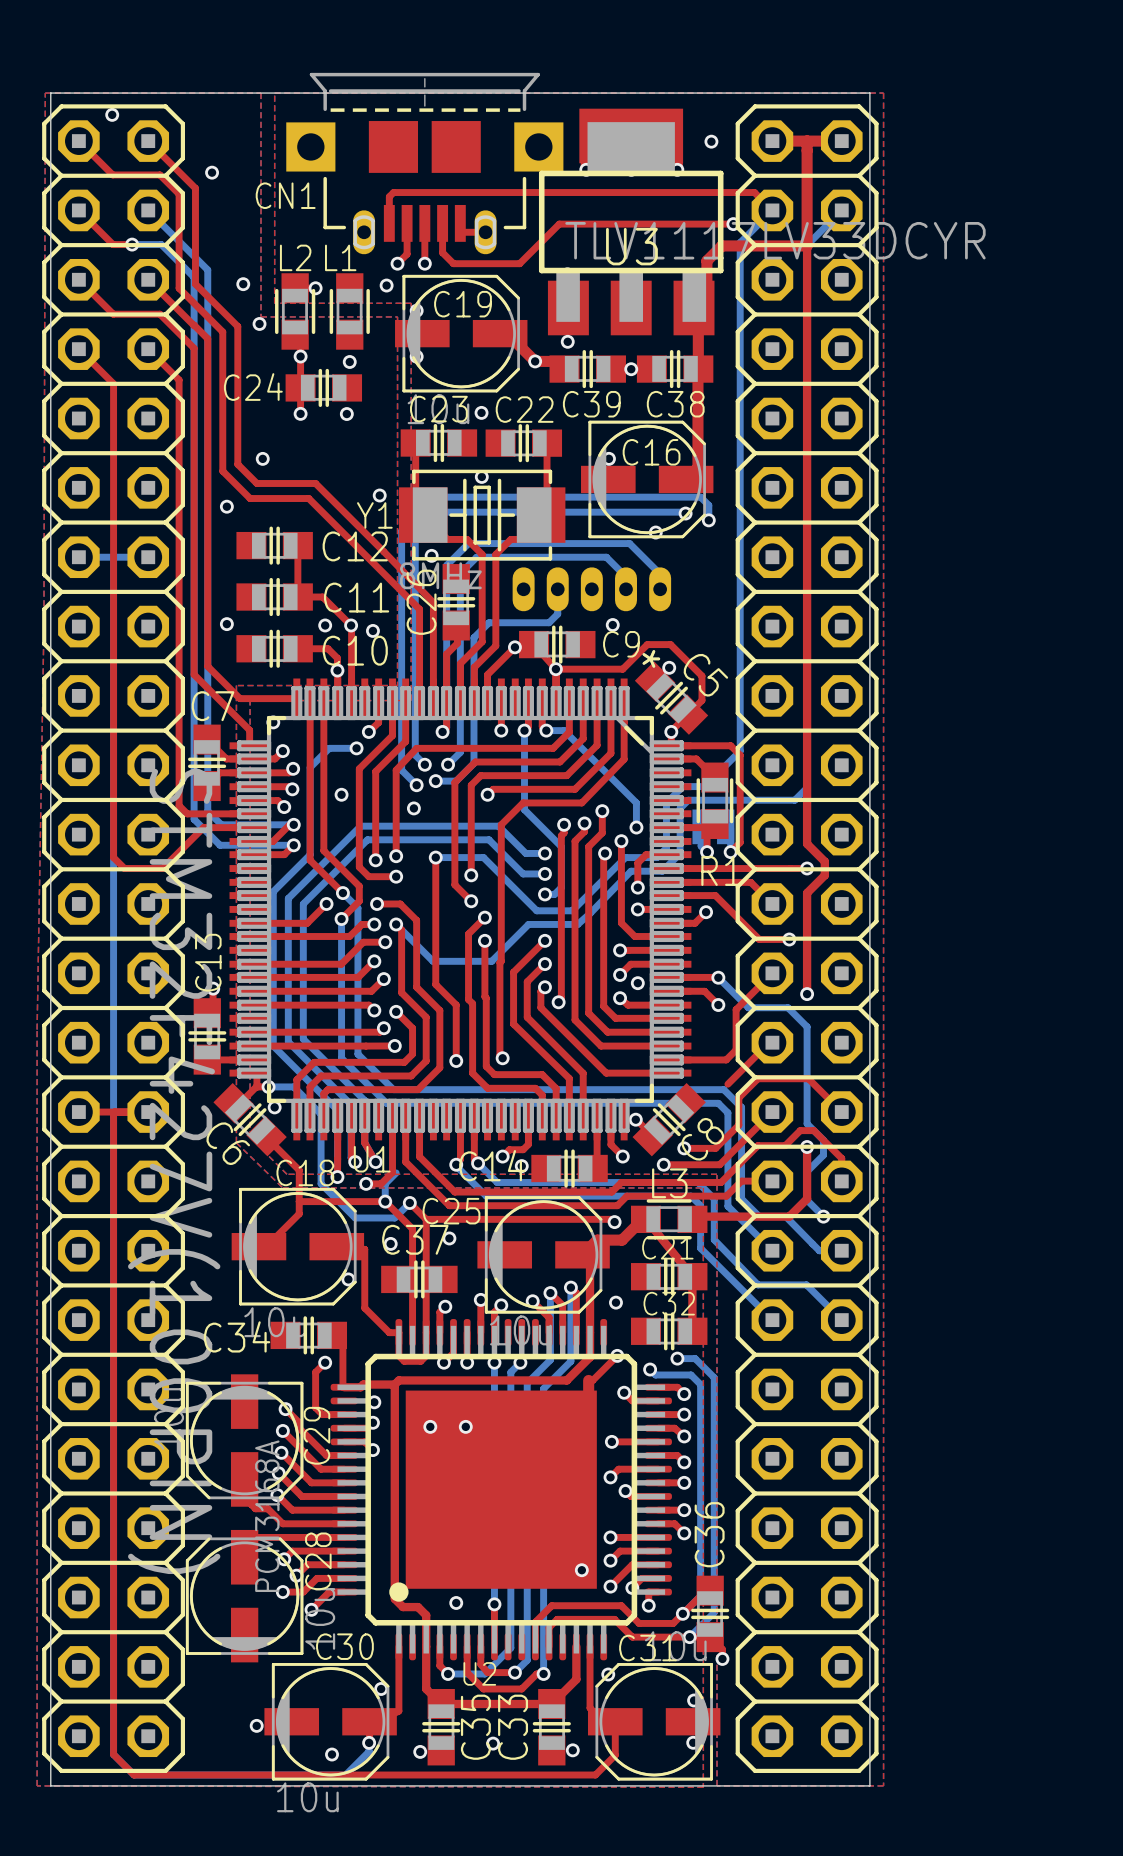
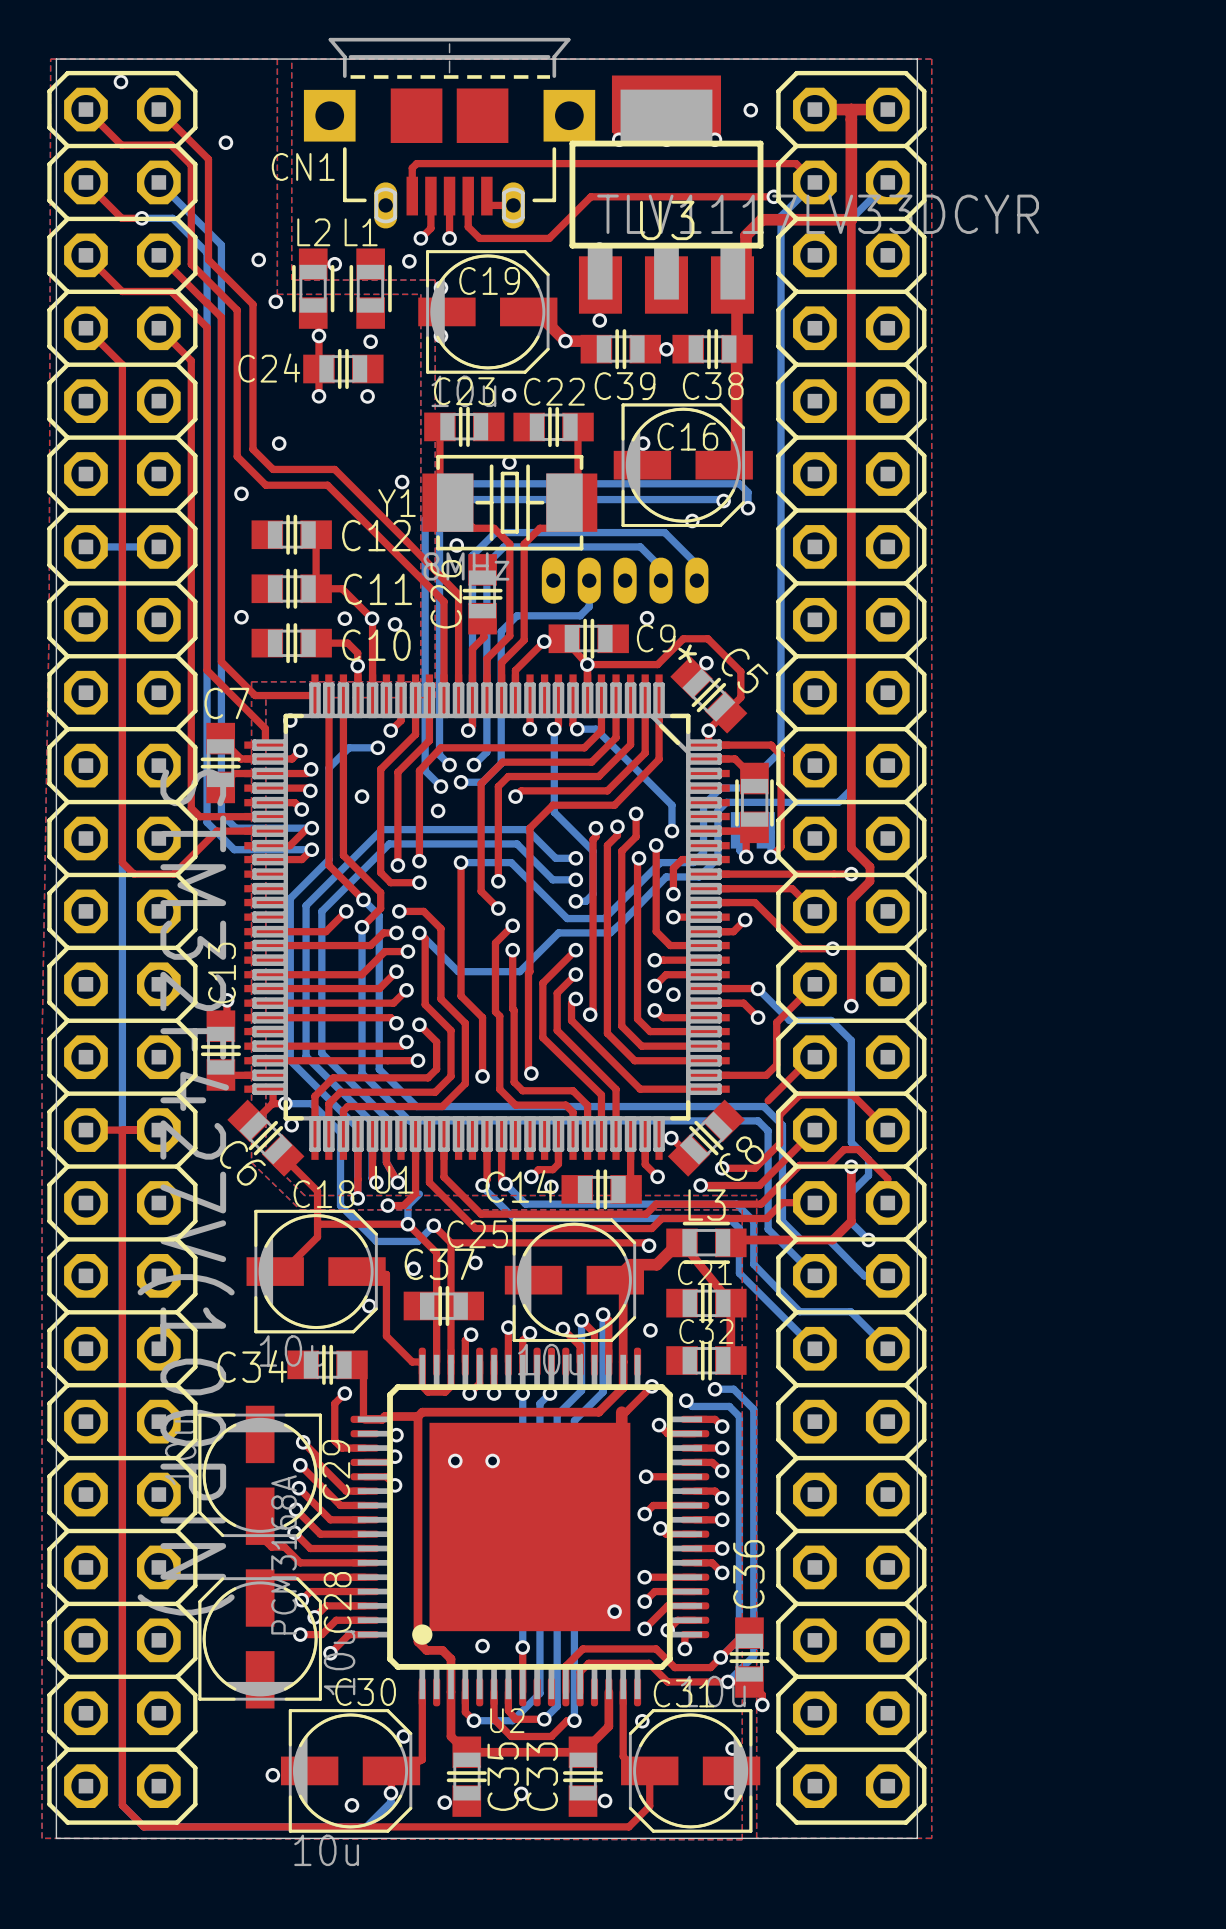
R1 name: R1 (721, 870) -> none

